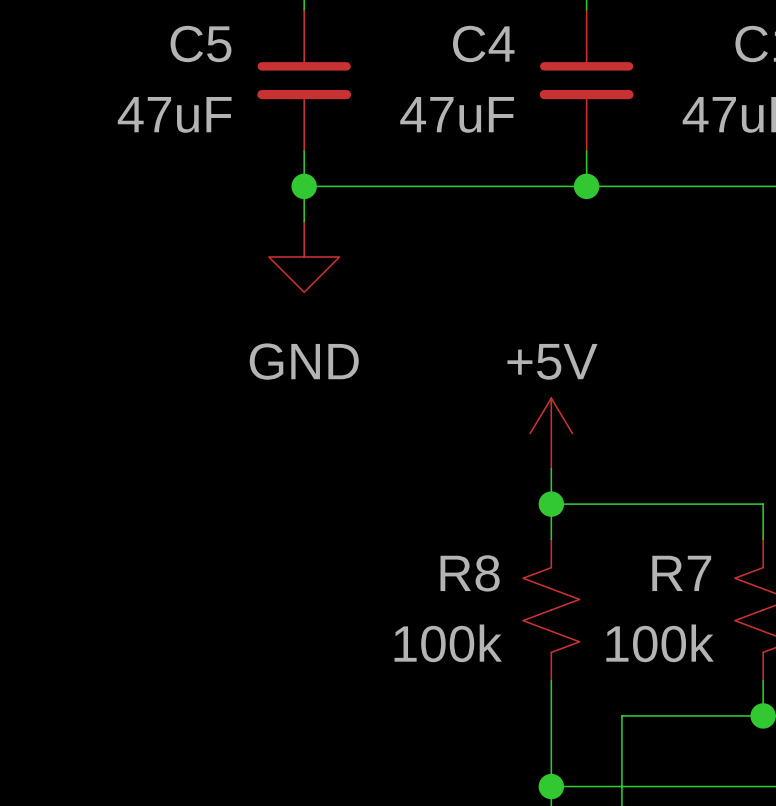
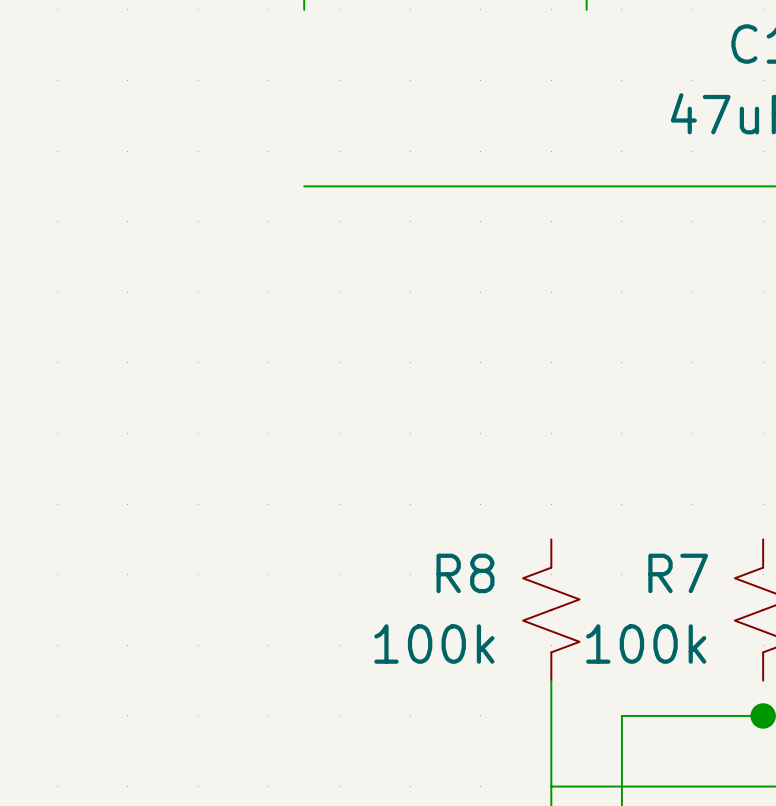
C5: 47uF (304, 80) -> none
C4: 47uF (586, 80) -> none
wire: (304, 151) (304, 221) -> none
wire: (586, 151) (586, 186) -> none
junction: (304, 186) -> none
junction: (586, 186) -> none
power symbol: GND (304, 256) -> none
power symbol: +5V (551, 433) -> none
wire: (551, 468) (551, 539) -> none
wire: (551, 504) (763, 504) (763, 539) -> none
junction: (551, 504) -> none
wire: (763, 680) (763, 715) -> none
junction: (551, 786) -> none

